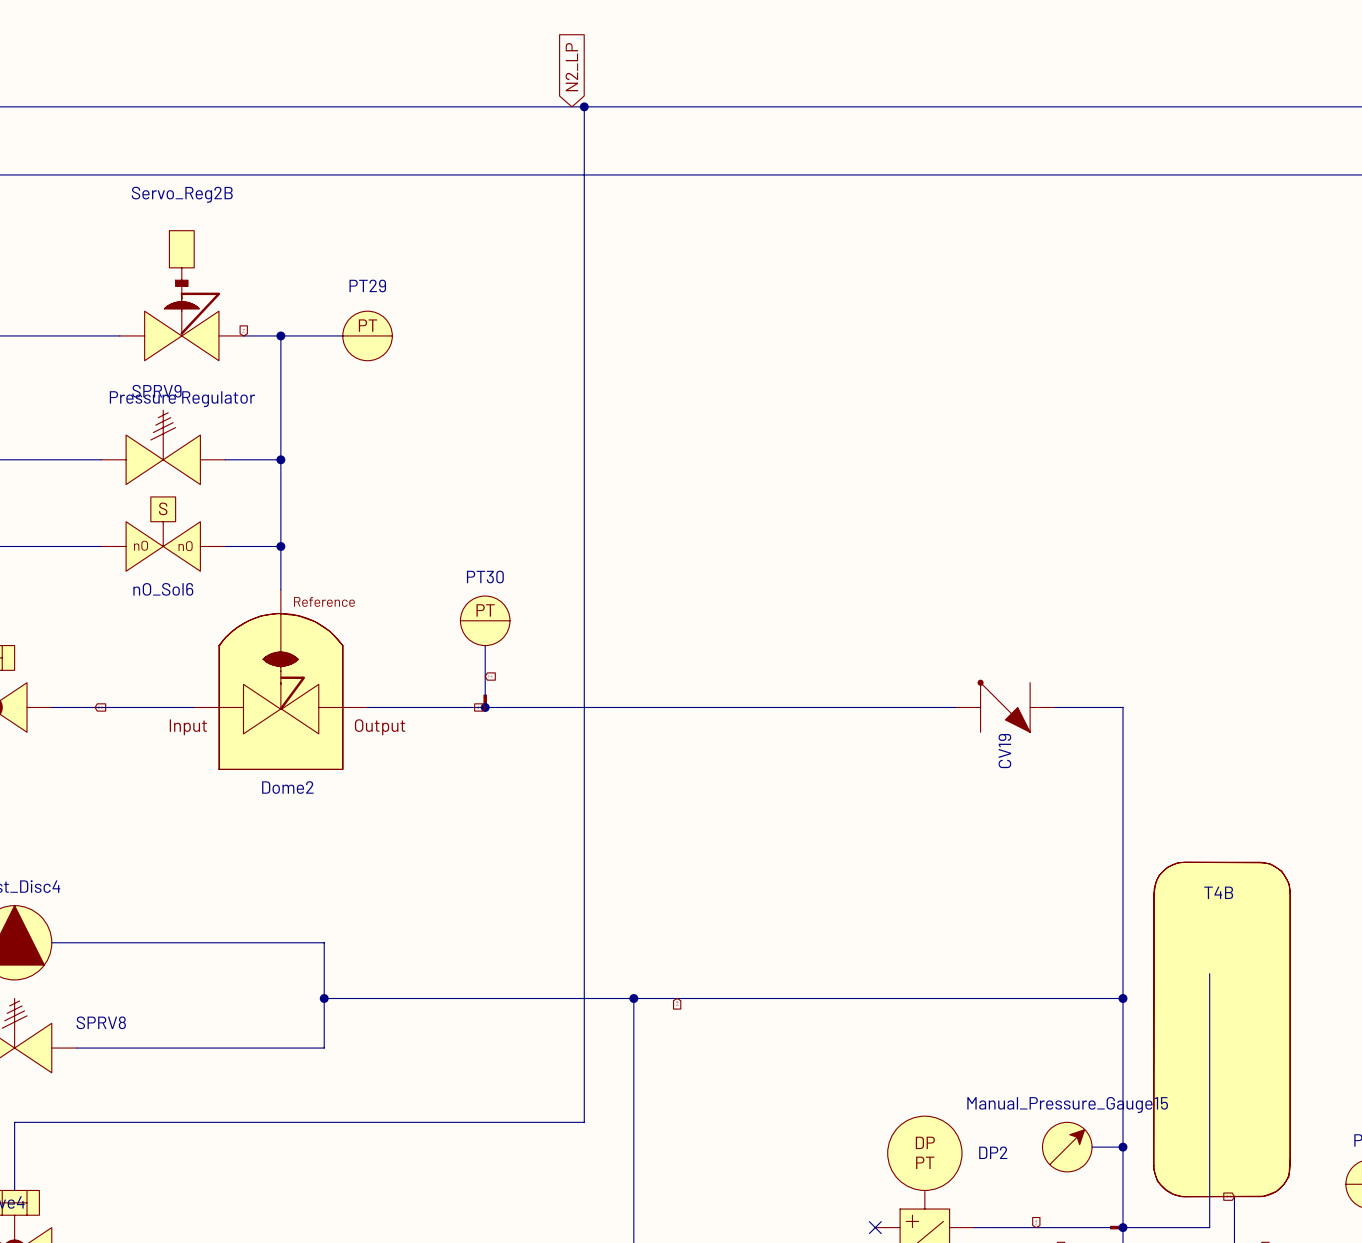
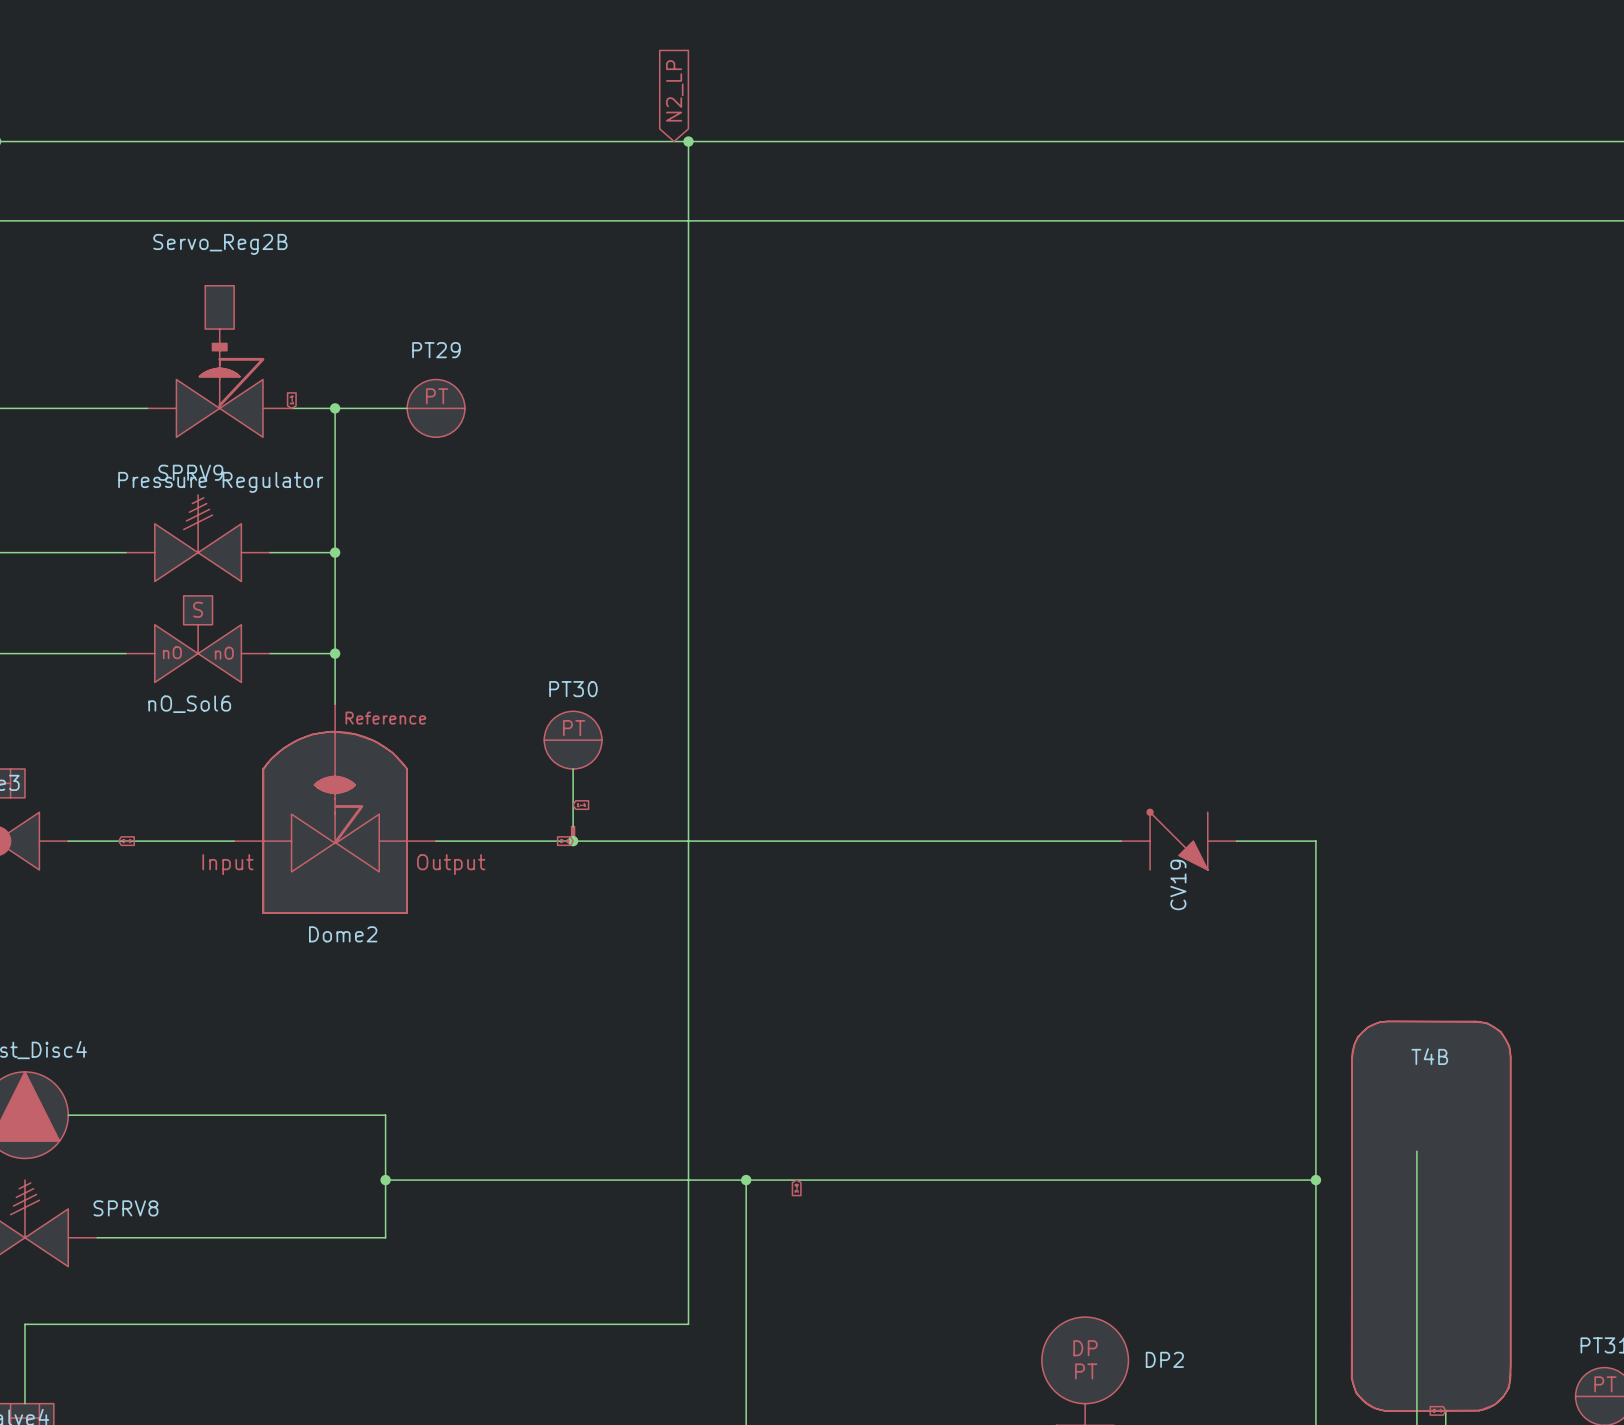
Manual_Pressure_Gauge15: (1067, 1147) -> none
wire: (1092, 1147) (1122, 1147) -> none
junction: (1122, 1147) -> none

